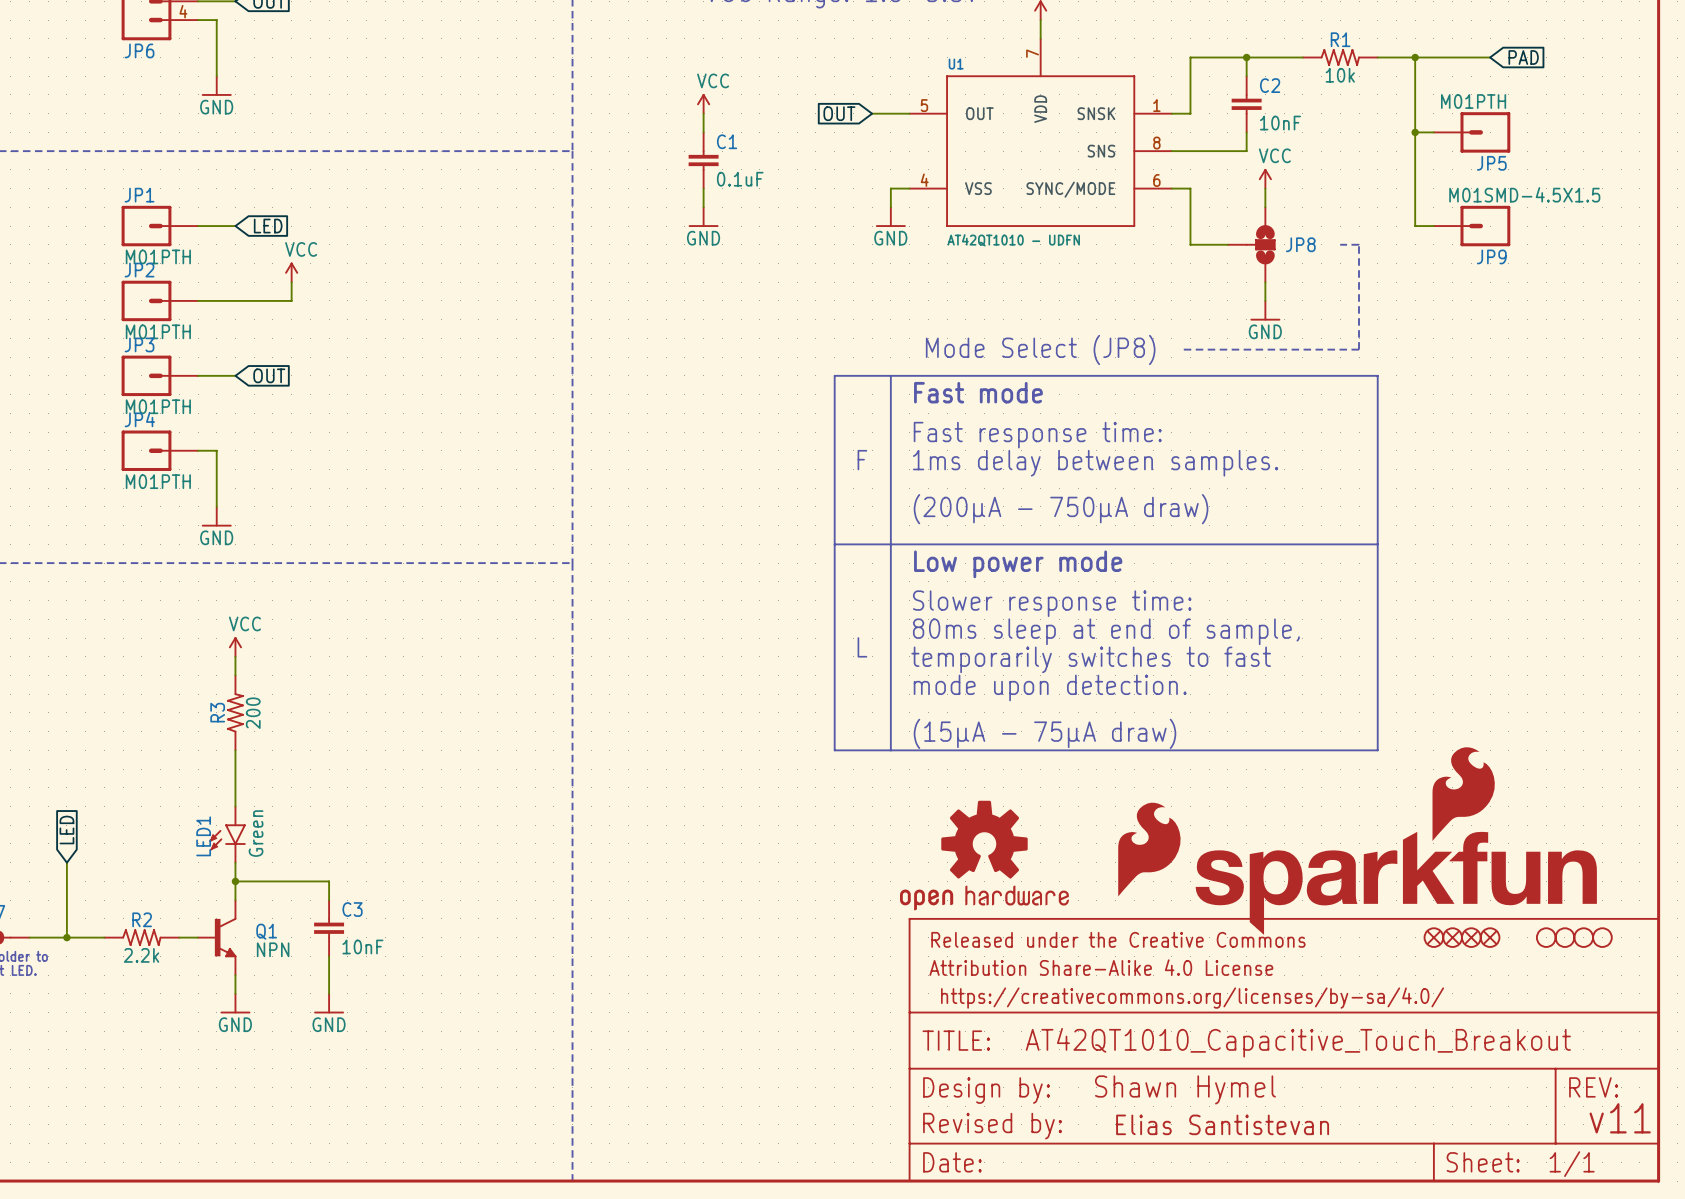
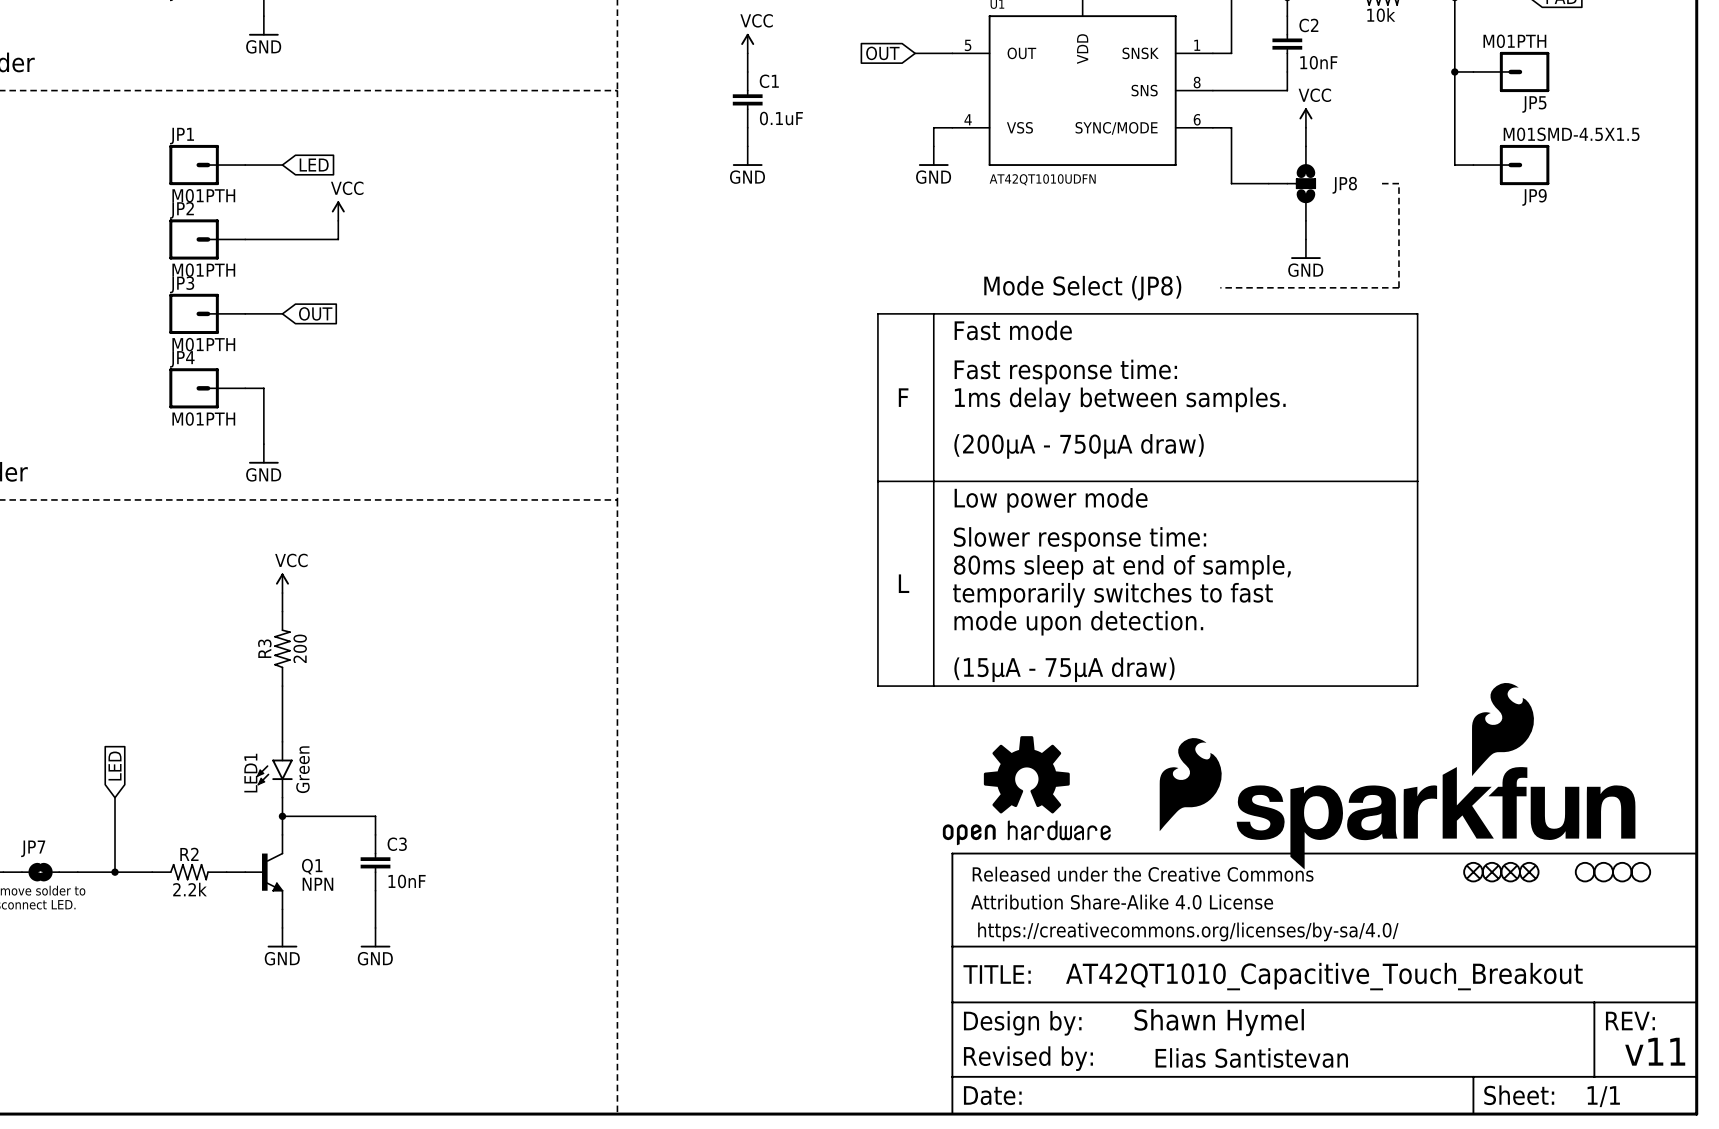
U1 value: AT42QT1010 - UDFN (1013, 240) -> AT42QT1010UDFN (1042, 179)

